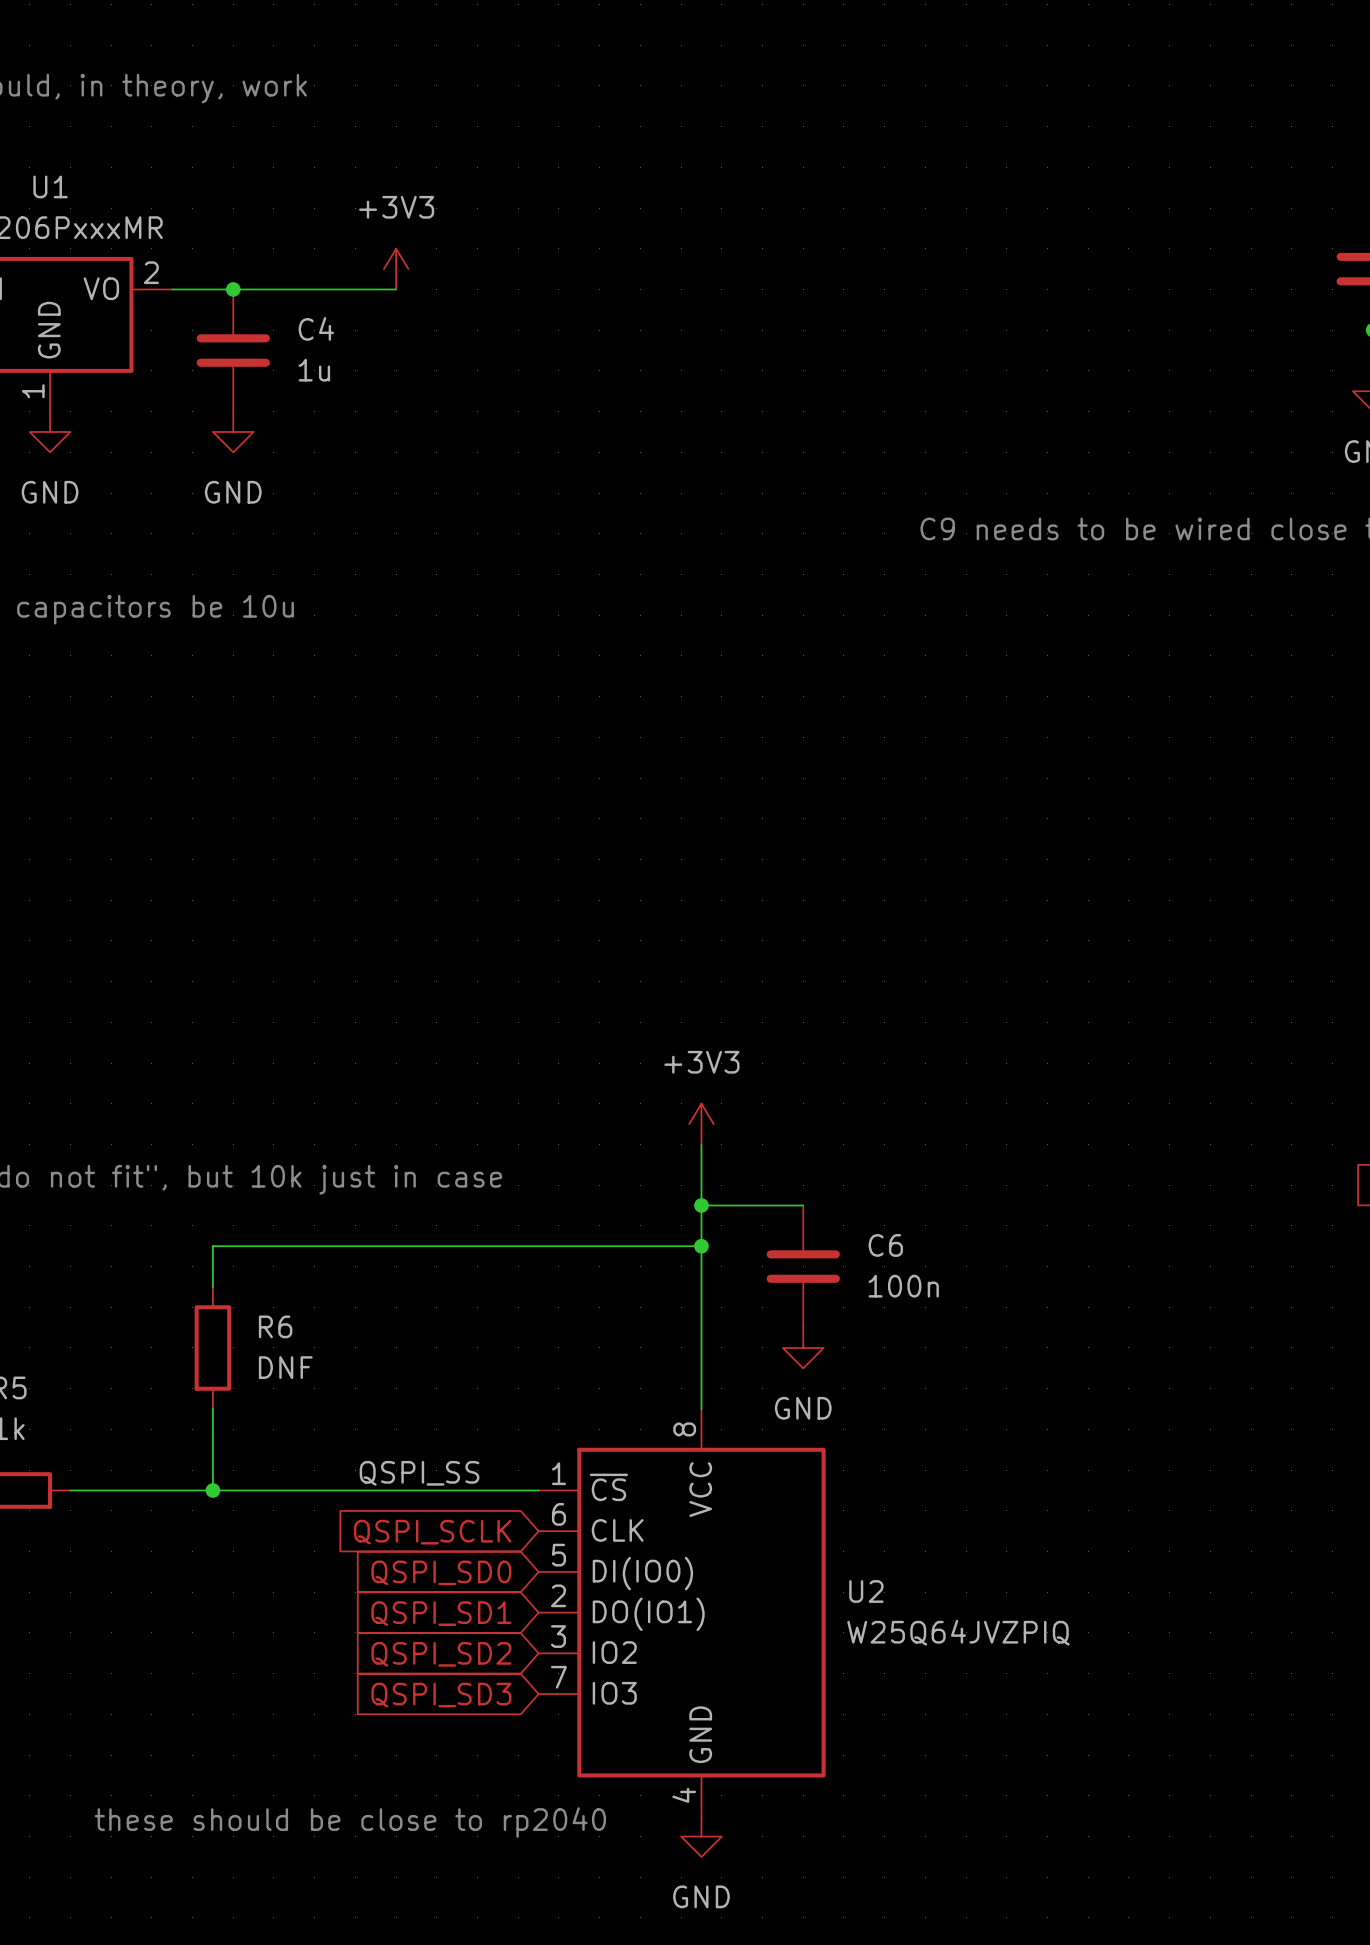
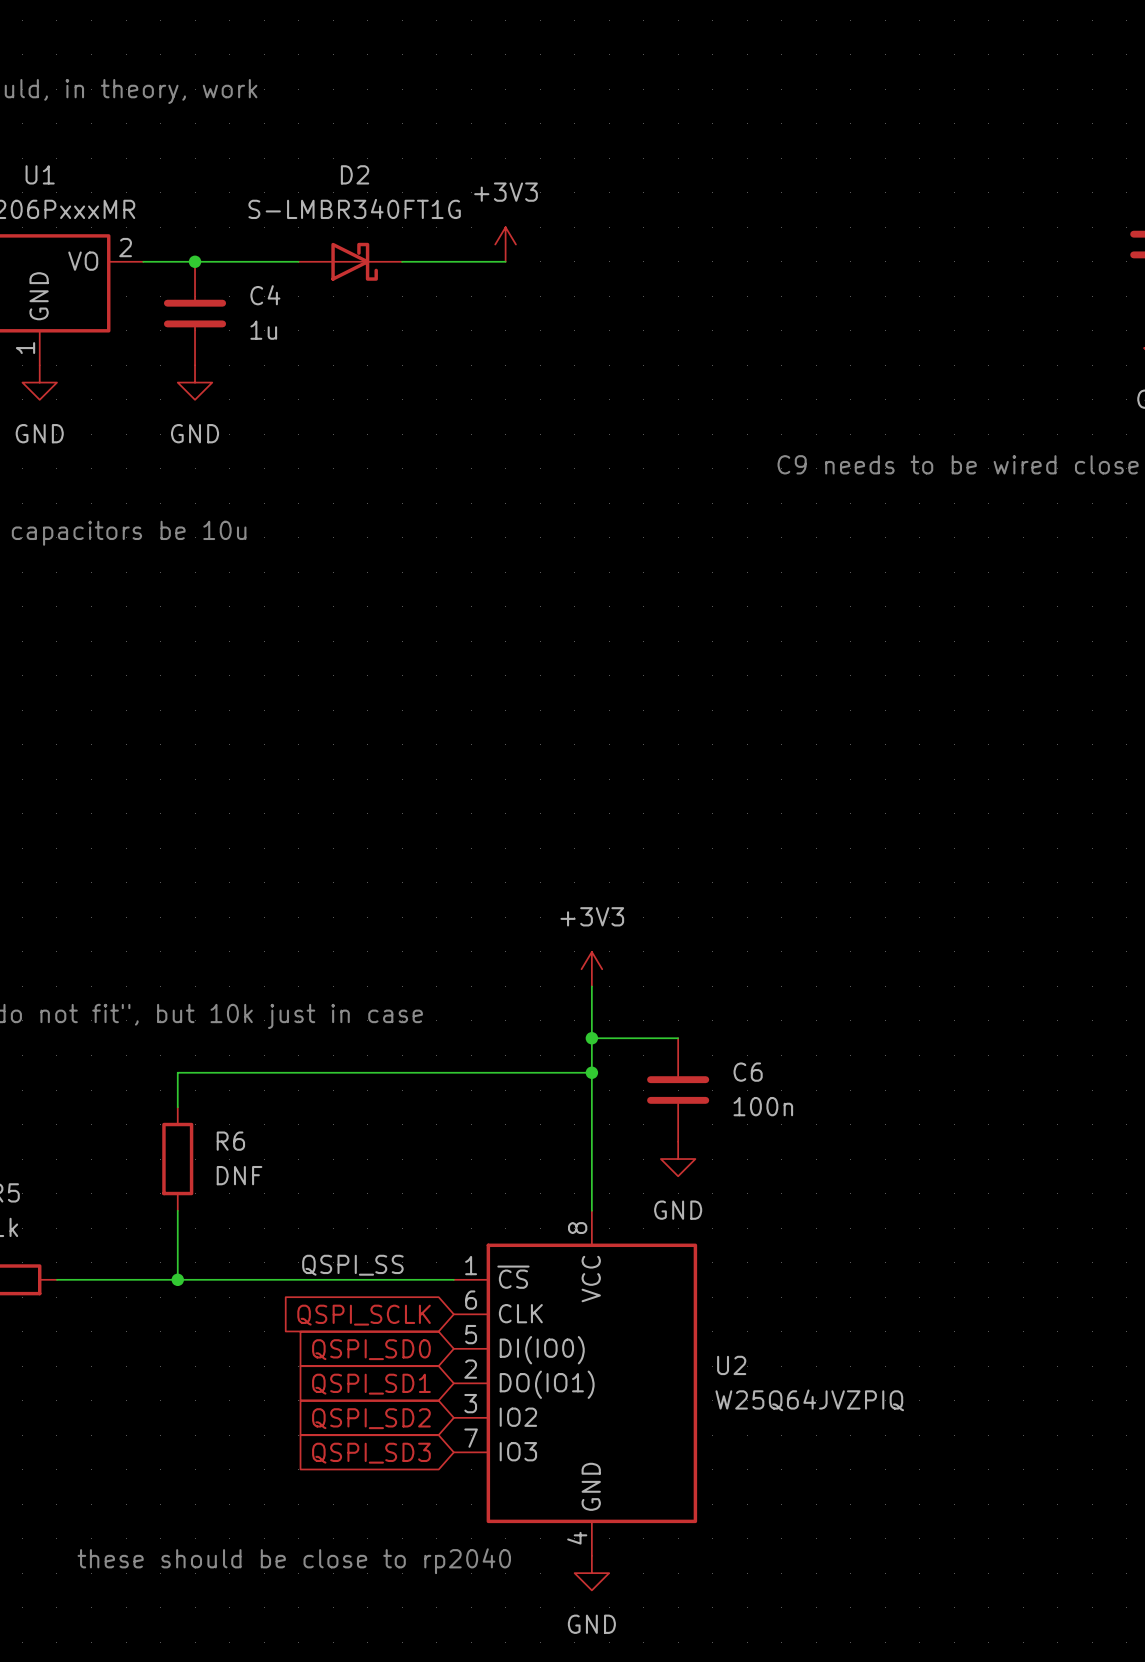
power symbol position: +3V3 (396, 269) -> +3V3 (505, 244)
D2: none -> S-LMBR340FT1G (350, 261)
wire: none -> (402, 261) (505, 261)

